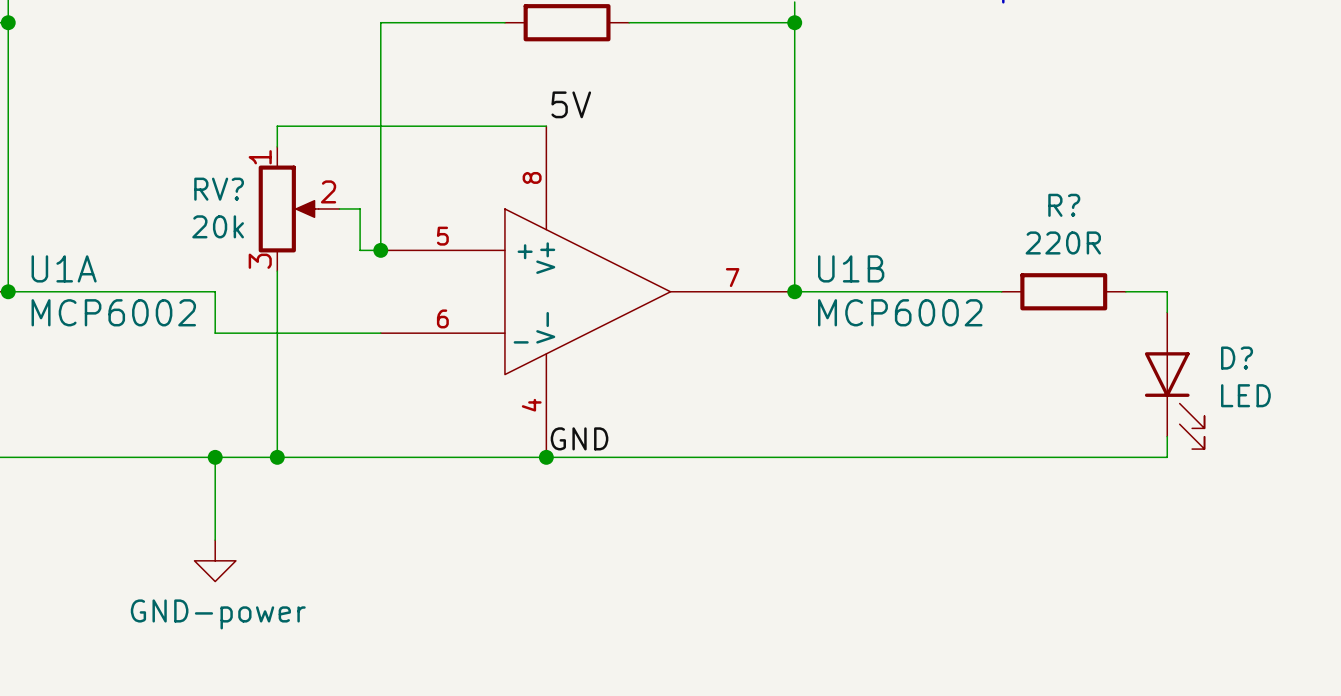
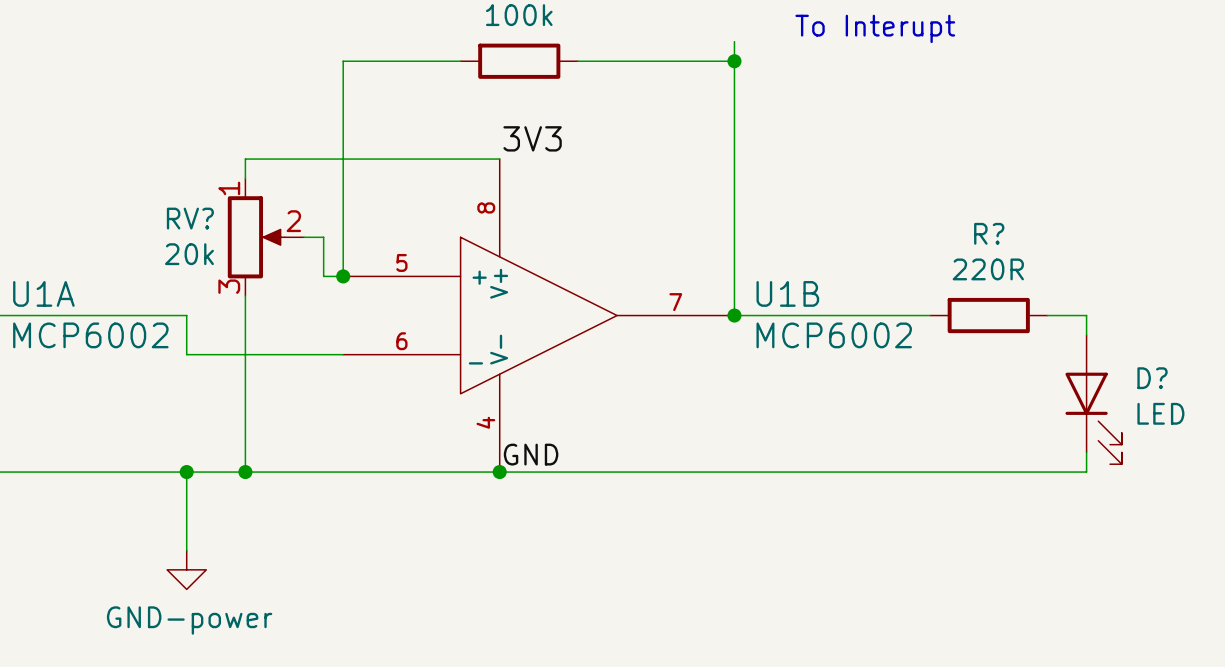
label: 5V (571, 104) -> 3V3 (532, 138)

